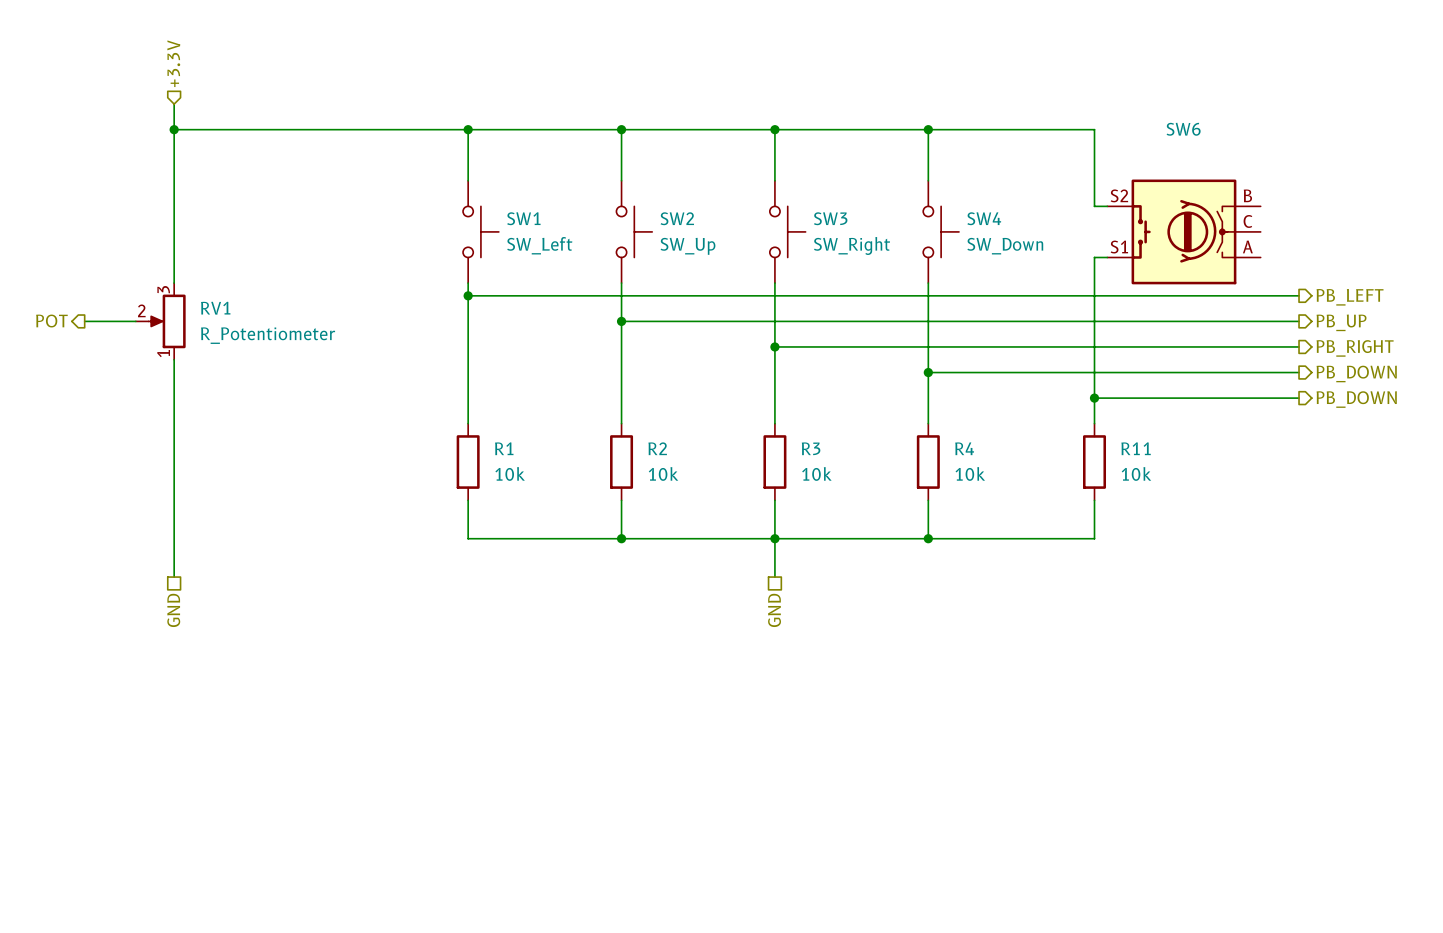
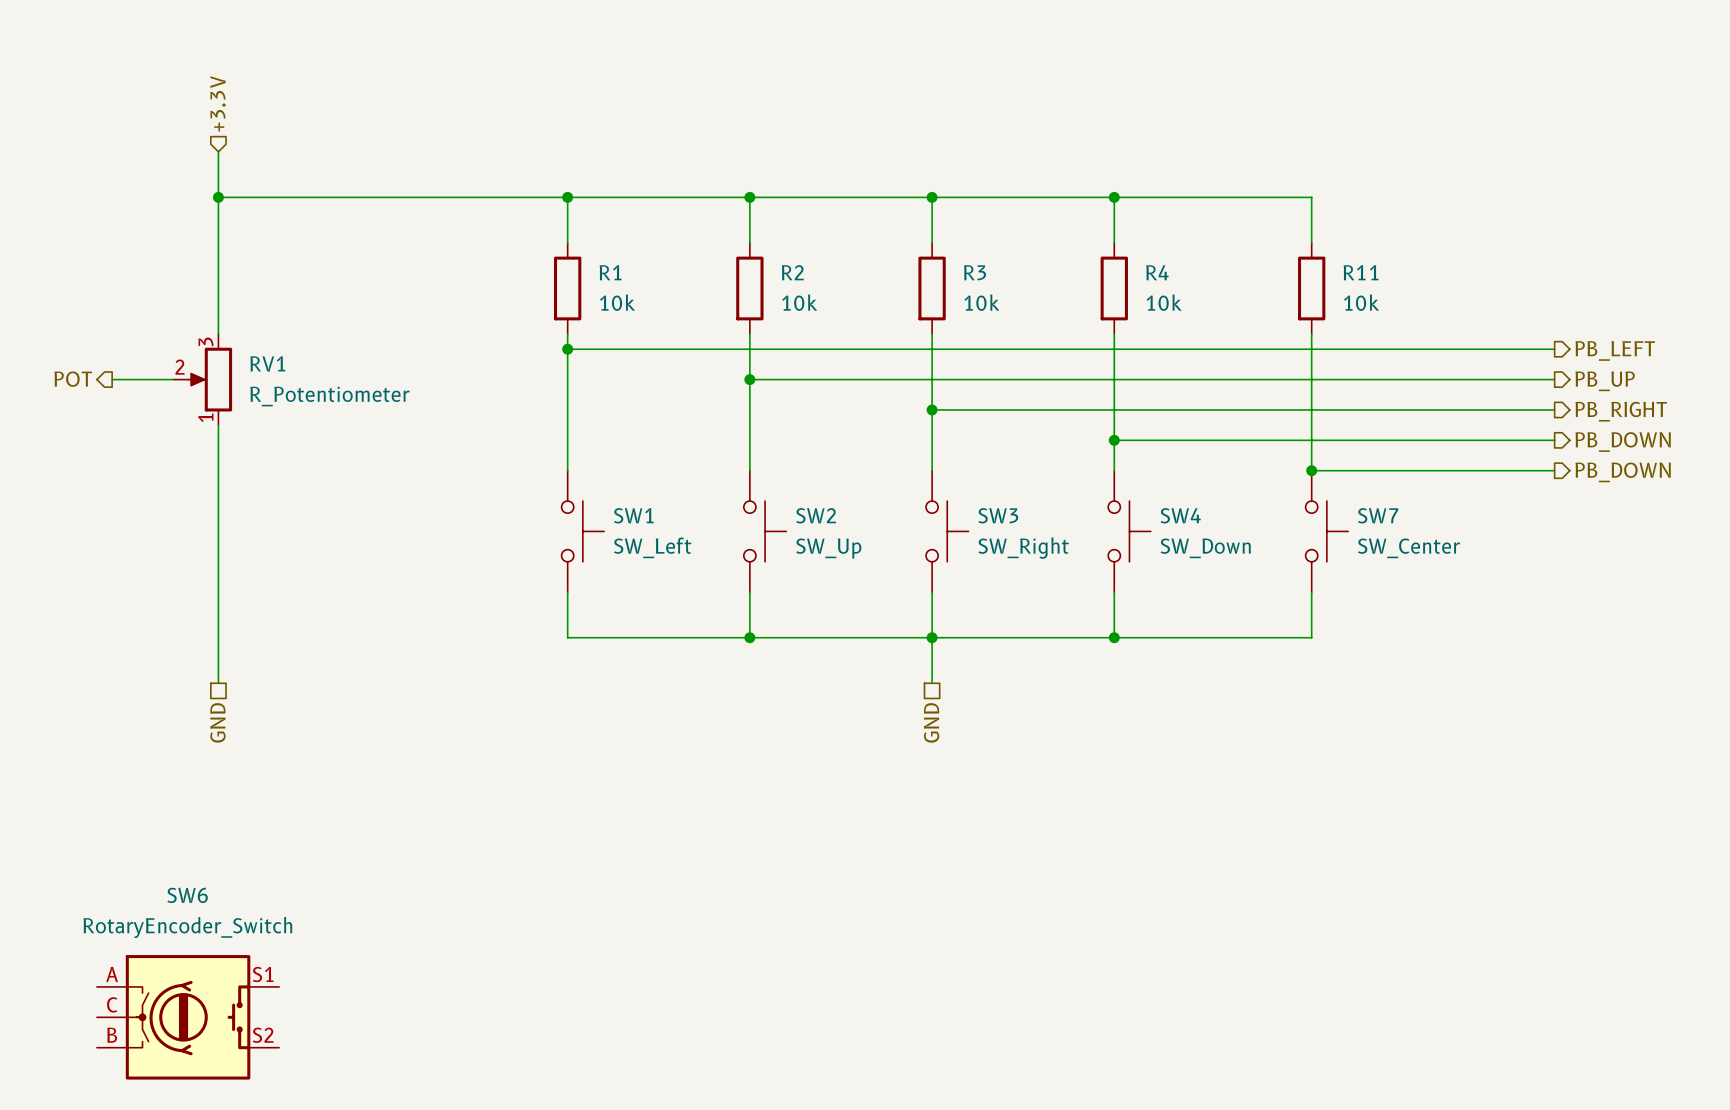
hierarchical label position: +3.3V (173, 63) -> +3.3V (217, 103)
wire: (174, 104) (174, 129) (1094, 129) (1094, 168) -> (218, 197) (1311, 197)
junction position: (174, 129) -> (218, 197)
wire: (468, 129) (468, 168) -> none
junction position: (468, 129) -> (567, 197)
wire: (621, 129) (621, 168) -> none
junction position: (621, 129) -> (749, 197)
wire: (774, 129) (774, 168) -> none
junction position: (774, 129) -> (932, 197)
wire: (928, 129) (928, 168) -> none
junction position: (928, 129) -> (1114, 197)
wire: (1094, 206) (1107, 206) -> none
SW1 position: (480, 231) -> (582, 531)
SW2 position: (634, 231) -> (765, 531)
SW3 position: (787, 231) -> (947, 531)
SW4 position: (941, 231) -> (1129, 531)
SW6 rotation: 0° (1183, 231) -> 180° (188, 1017)
SW6 position: (1183, 231) -> (188, 1017)
wire: (1107, 257) (1094, 257) (1094, 283) -> none
SW7: none -> SW_Center (1326, 531)
R1 position: (468, 462) -> (567, 288)
R2 position: (621, 462) -> (749, 288)
R3 position: (774, 462) -> (932, 288)
R4 position: (928, 462) -> (1114, 288)
R11 position: (1094, 462) -> (1311, 288)
SW6 value: none -> RotaryEncoder_Switch (187, 927)

